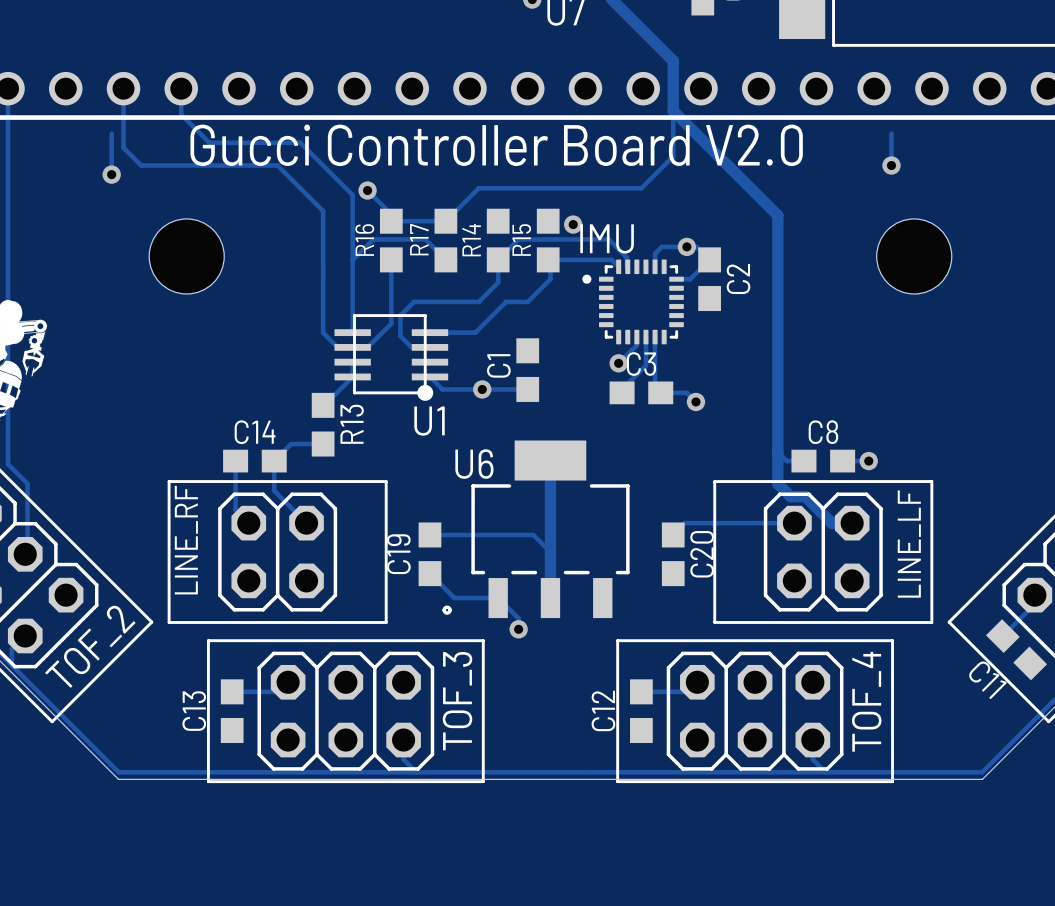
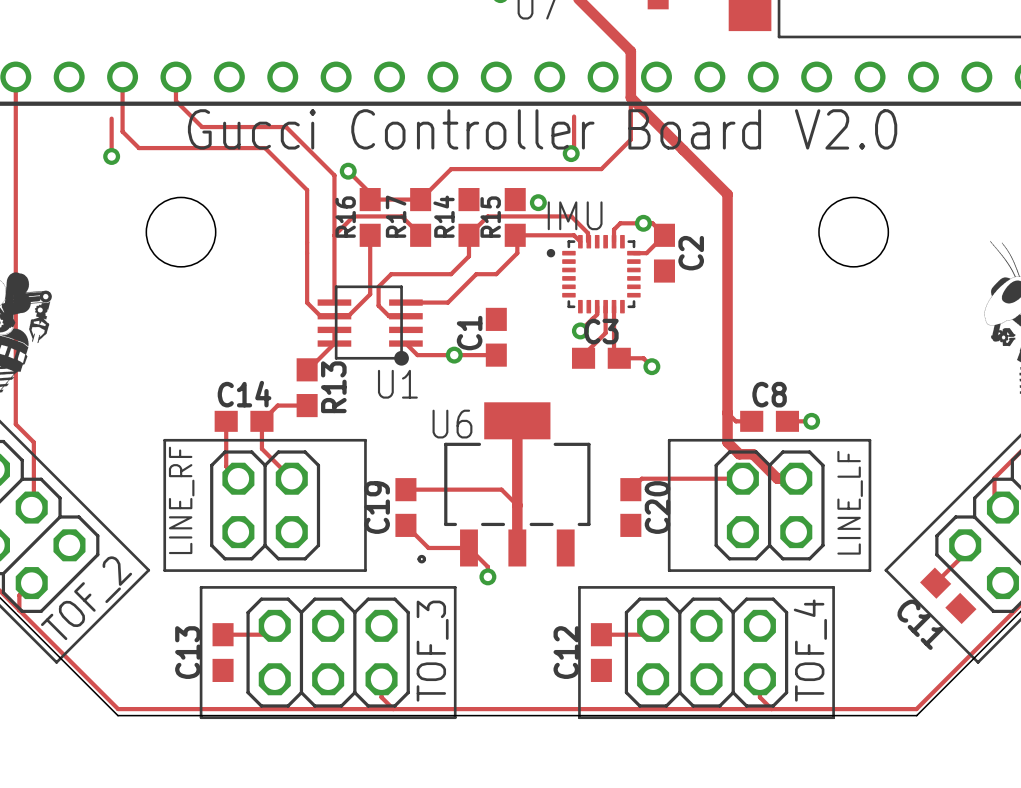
track: none -> (574, 116) (574, 150) (571, 153)
track: (891, 133) (891, 165) -> none
via: (891, 165) -> none
via: none -> (571, 153)

